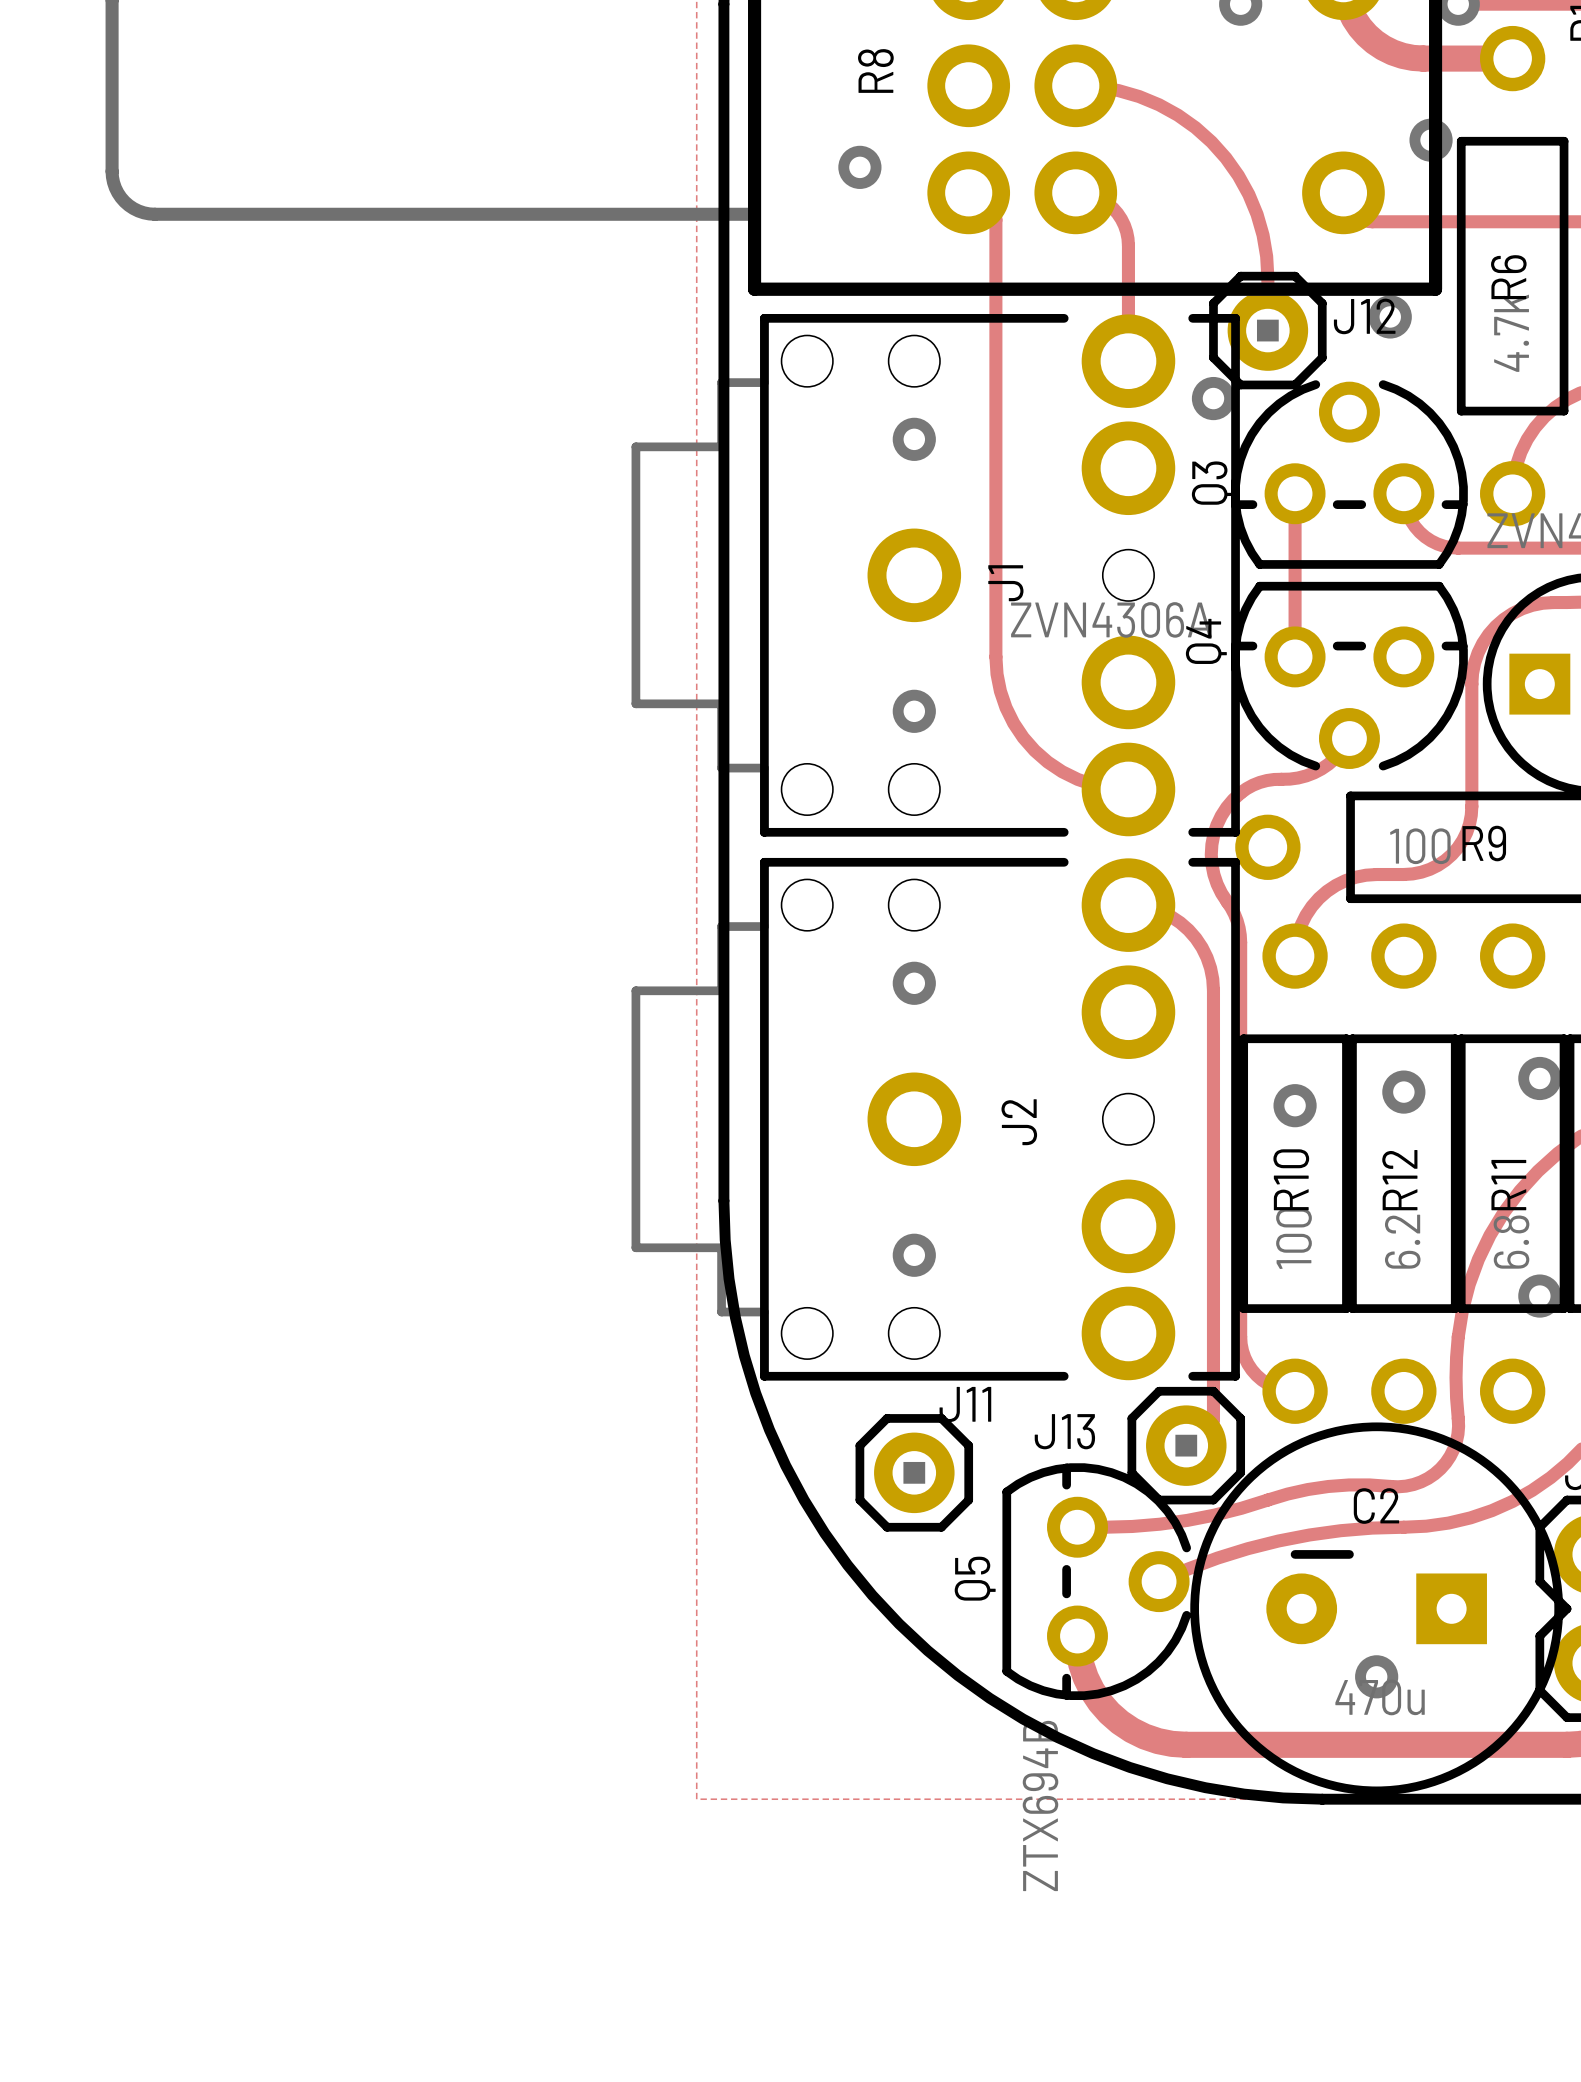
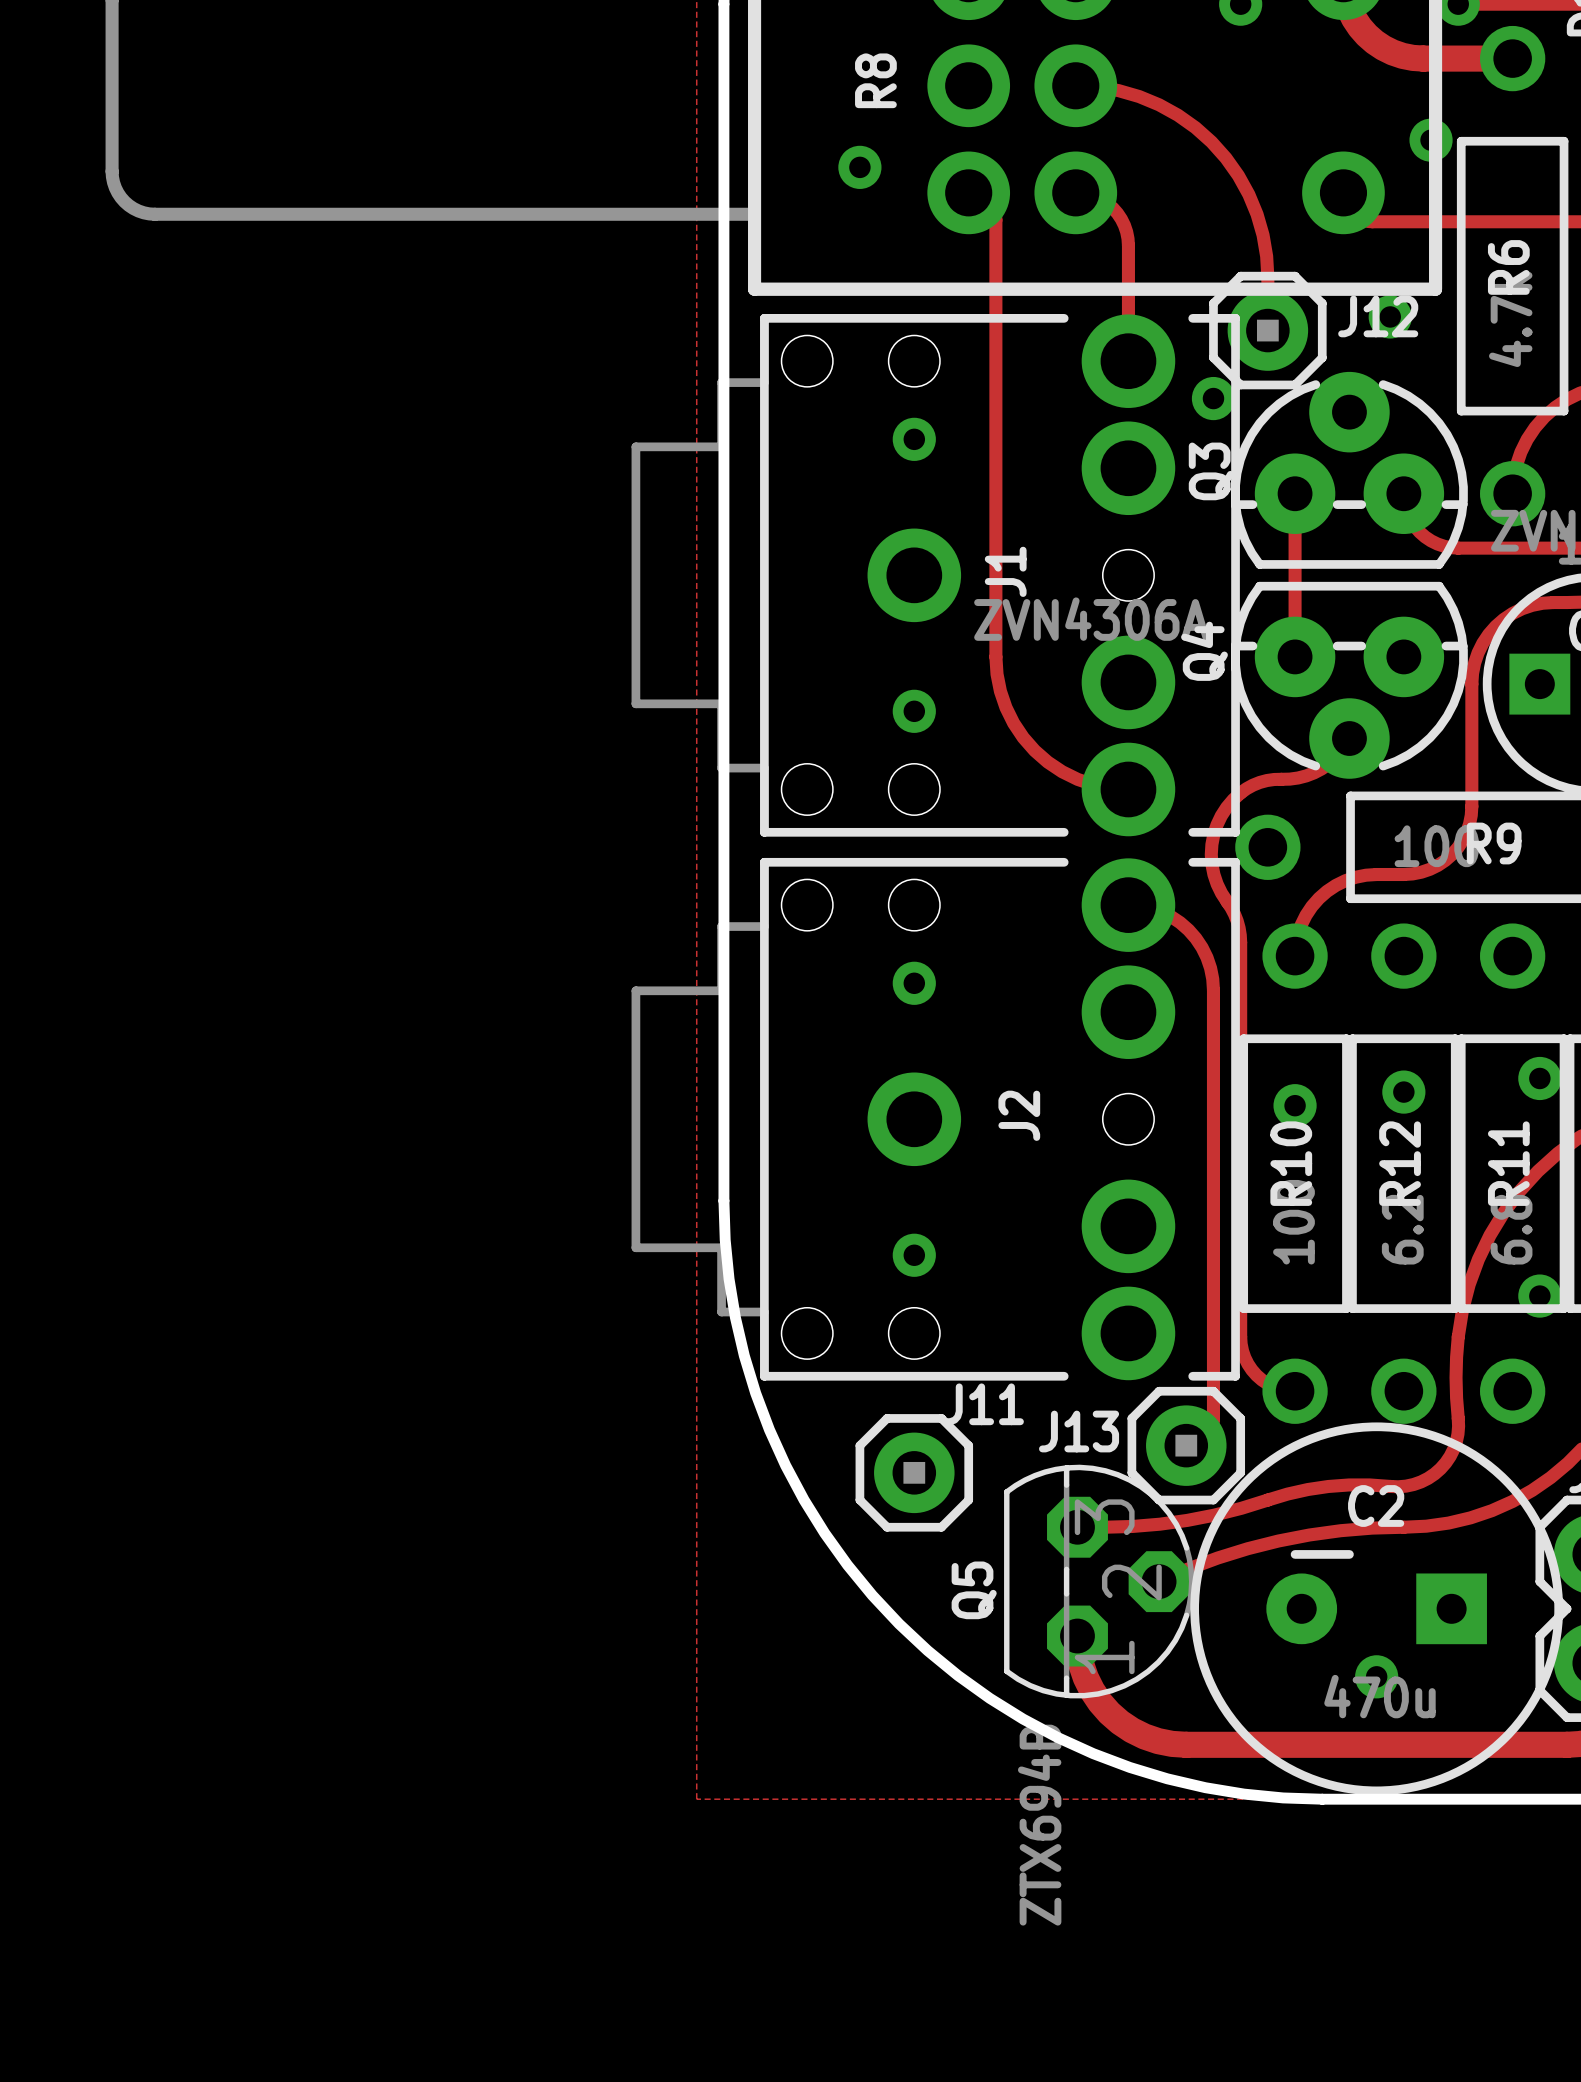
Q3 footprint: [1231, 380, 1468, 569] -> [1231, 371, 1468, 569]
Q4 footprint: [1231, 581, 1468, 771] -> [1231, 581, 1468, 779]
Q5 footprint: [1002, 1463, 1191, 1701] -> [1004, 1464, 1195, 1699]

